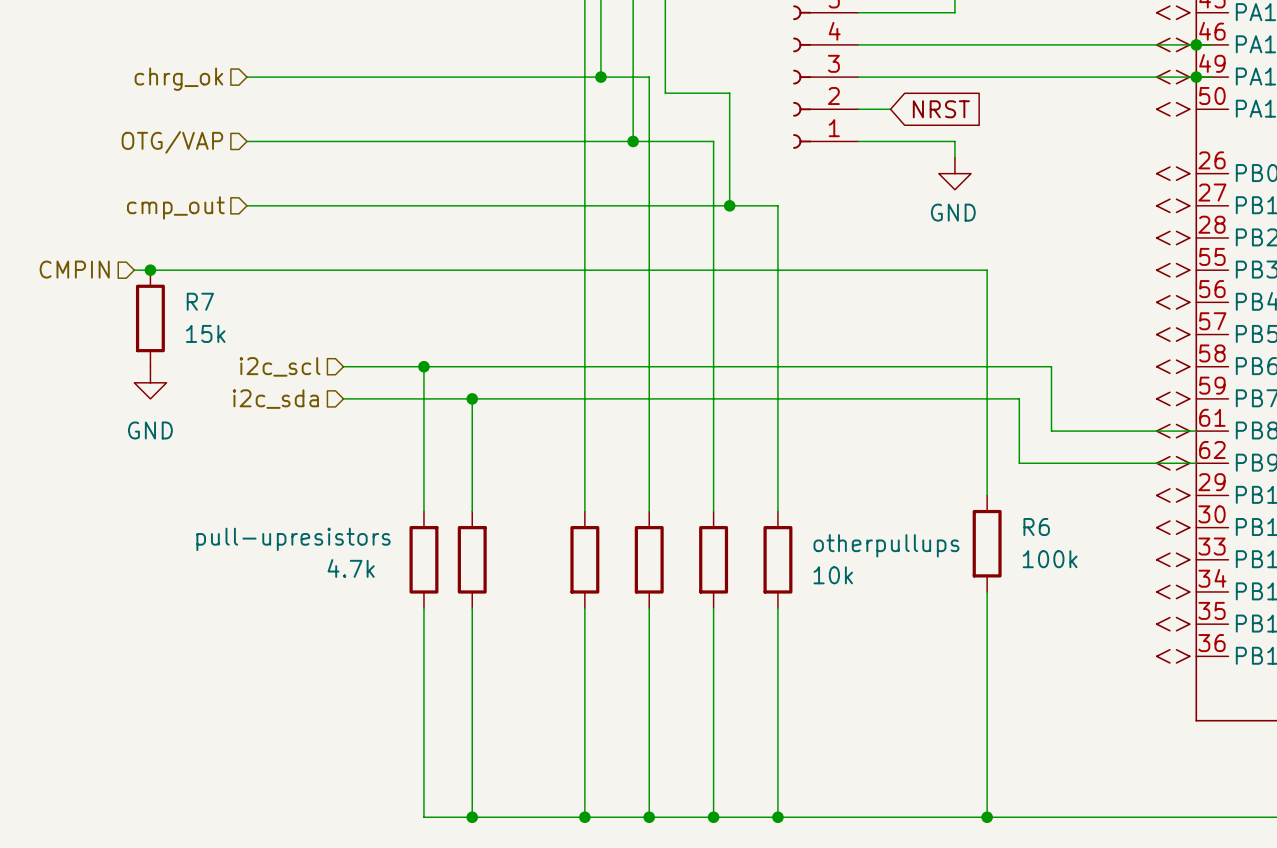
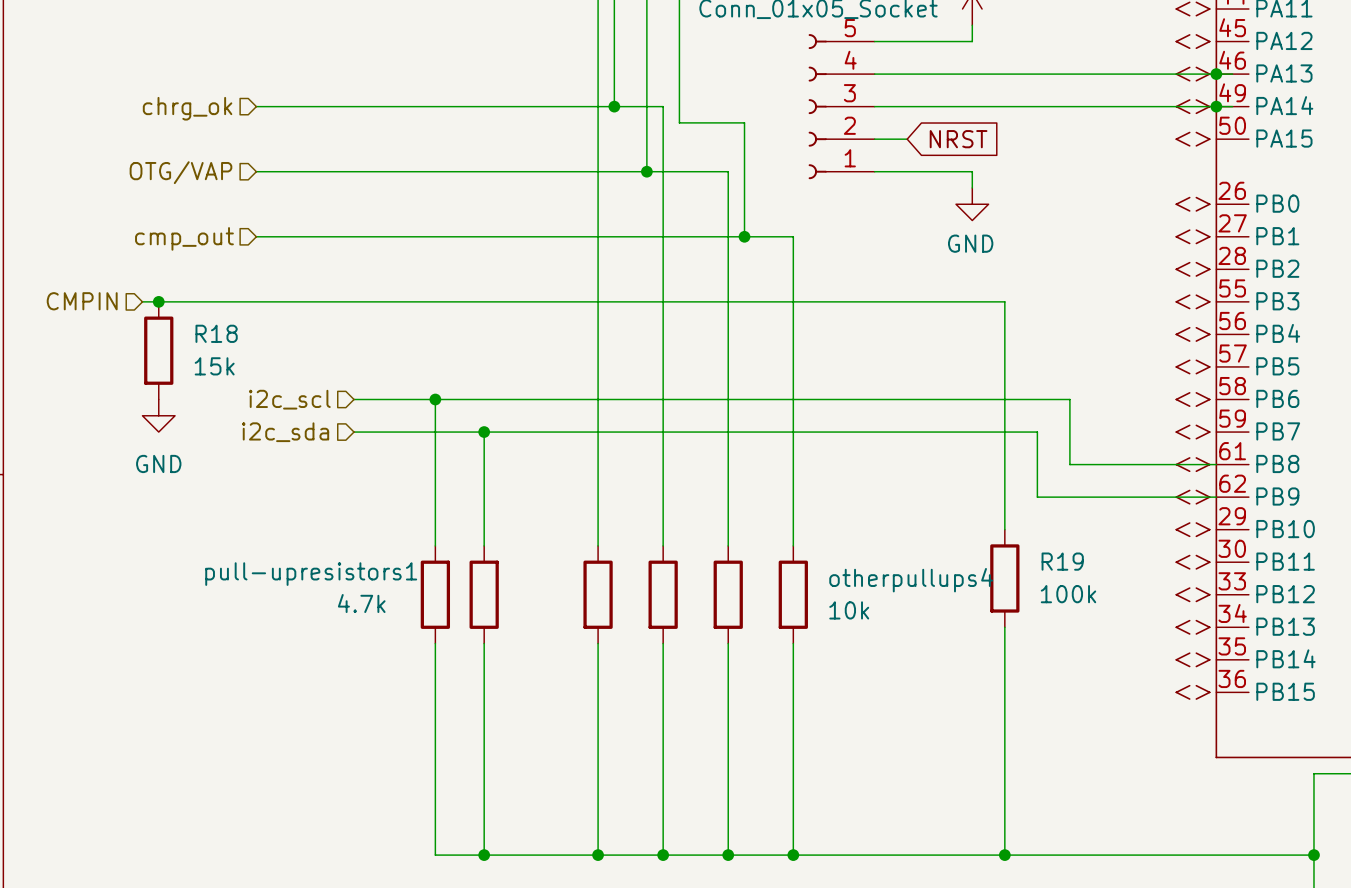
R7 name: R7 (200, 301) -> R18 (216, 333)
R6 name: R6 (1036, 527) -> R19 (1062, 561)
pull-upresistors name: pull-upresistors (293, 539) -> pull-upresistors1 (311, 574)
otherpullups name: otherpullups (886, 545) -> otherpullups4 (911, 580)

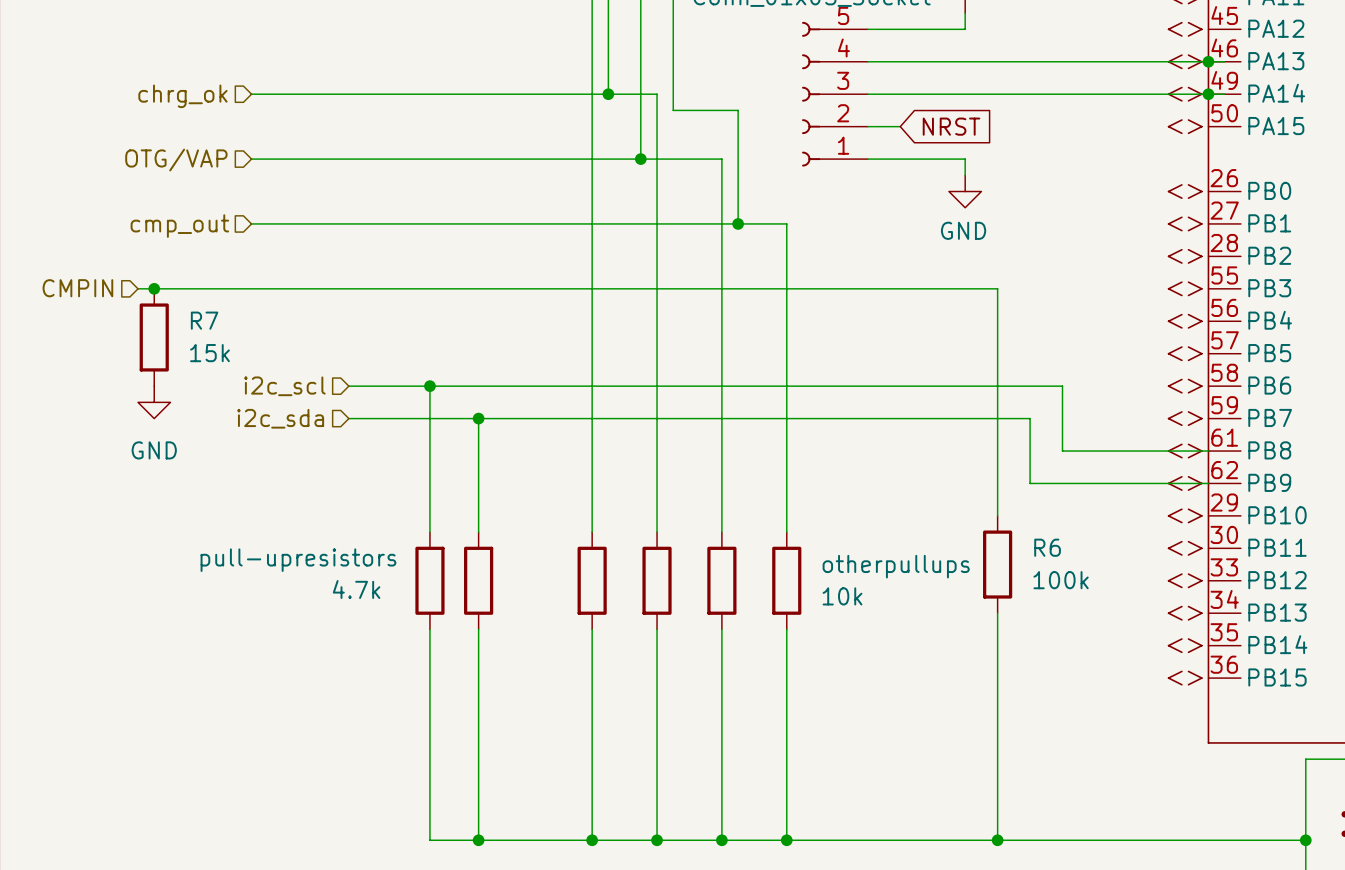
R18 name: R18 (216, 333) -> R7 (204, 320)
R19 name: R19 (1062, 561) -> R6 (1047, 547)
pull-upresistors1 name: pull-upresistors1 (311, 574) -> pull-upresistors (298, 560)
otherpullups4 name: otherpullups4 (911, 580) -> otherpullups (896, 566)

